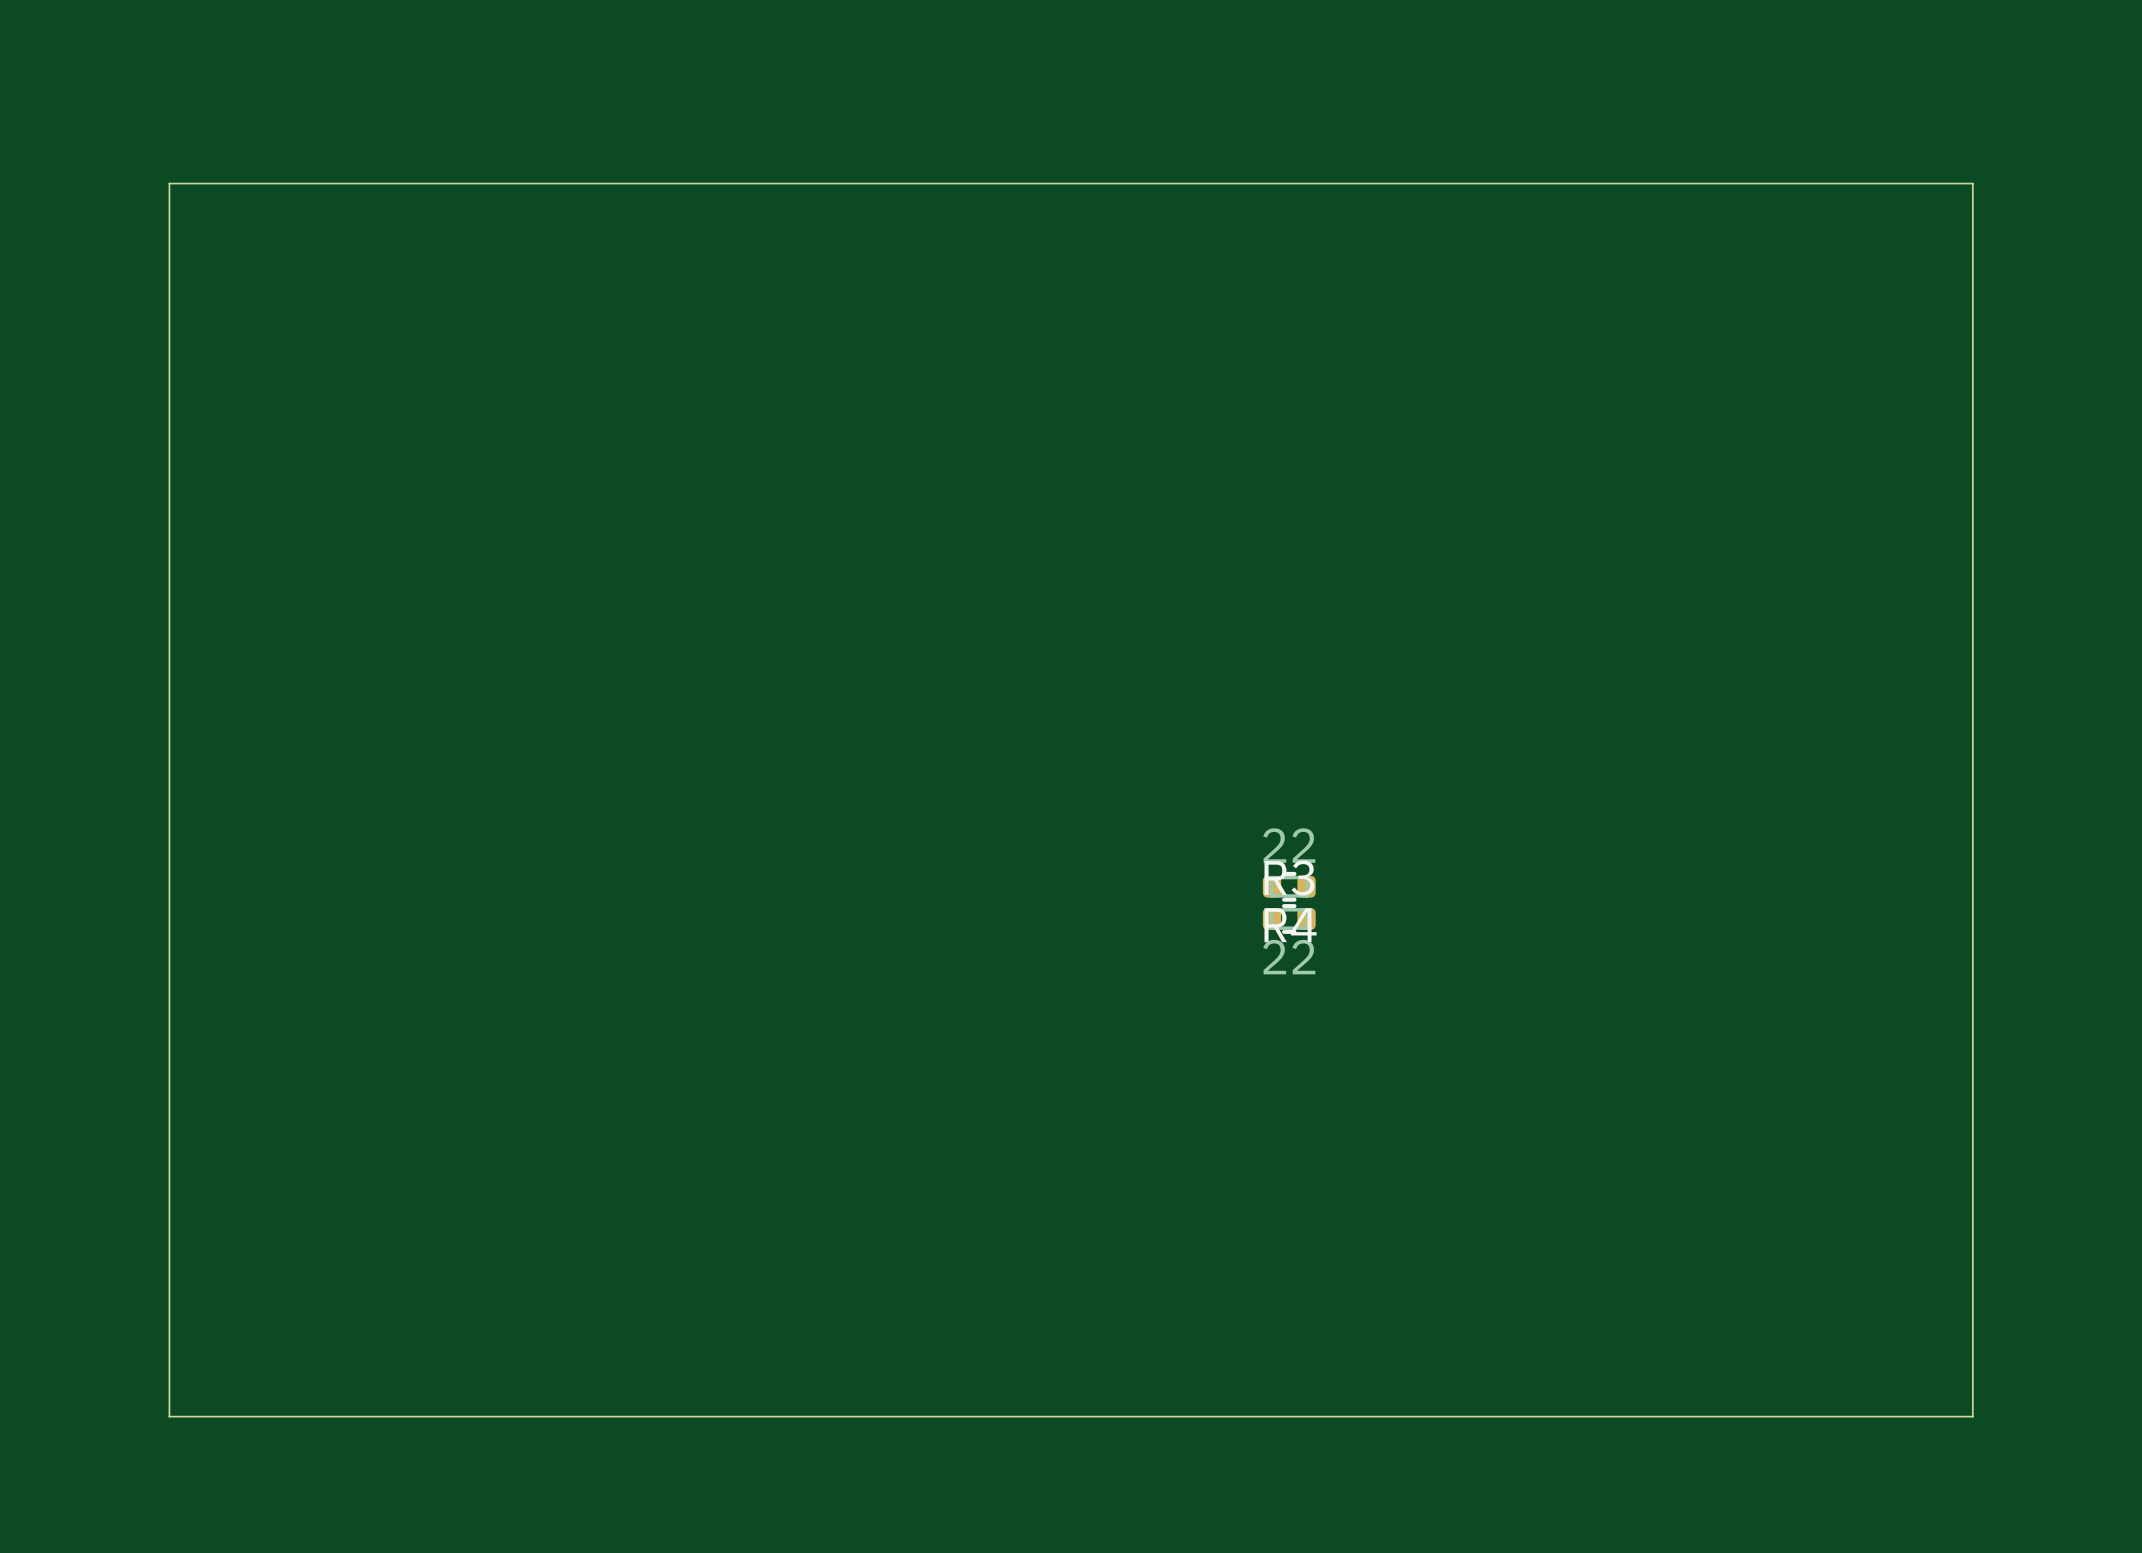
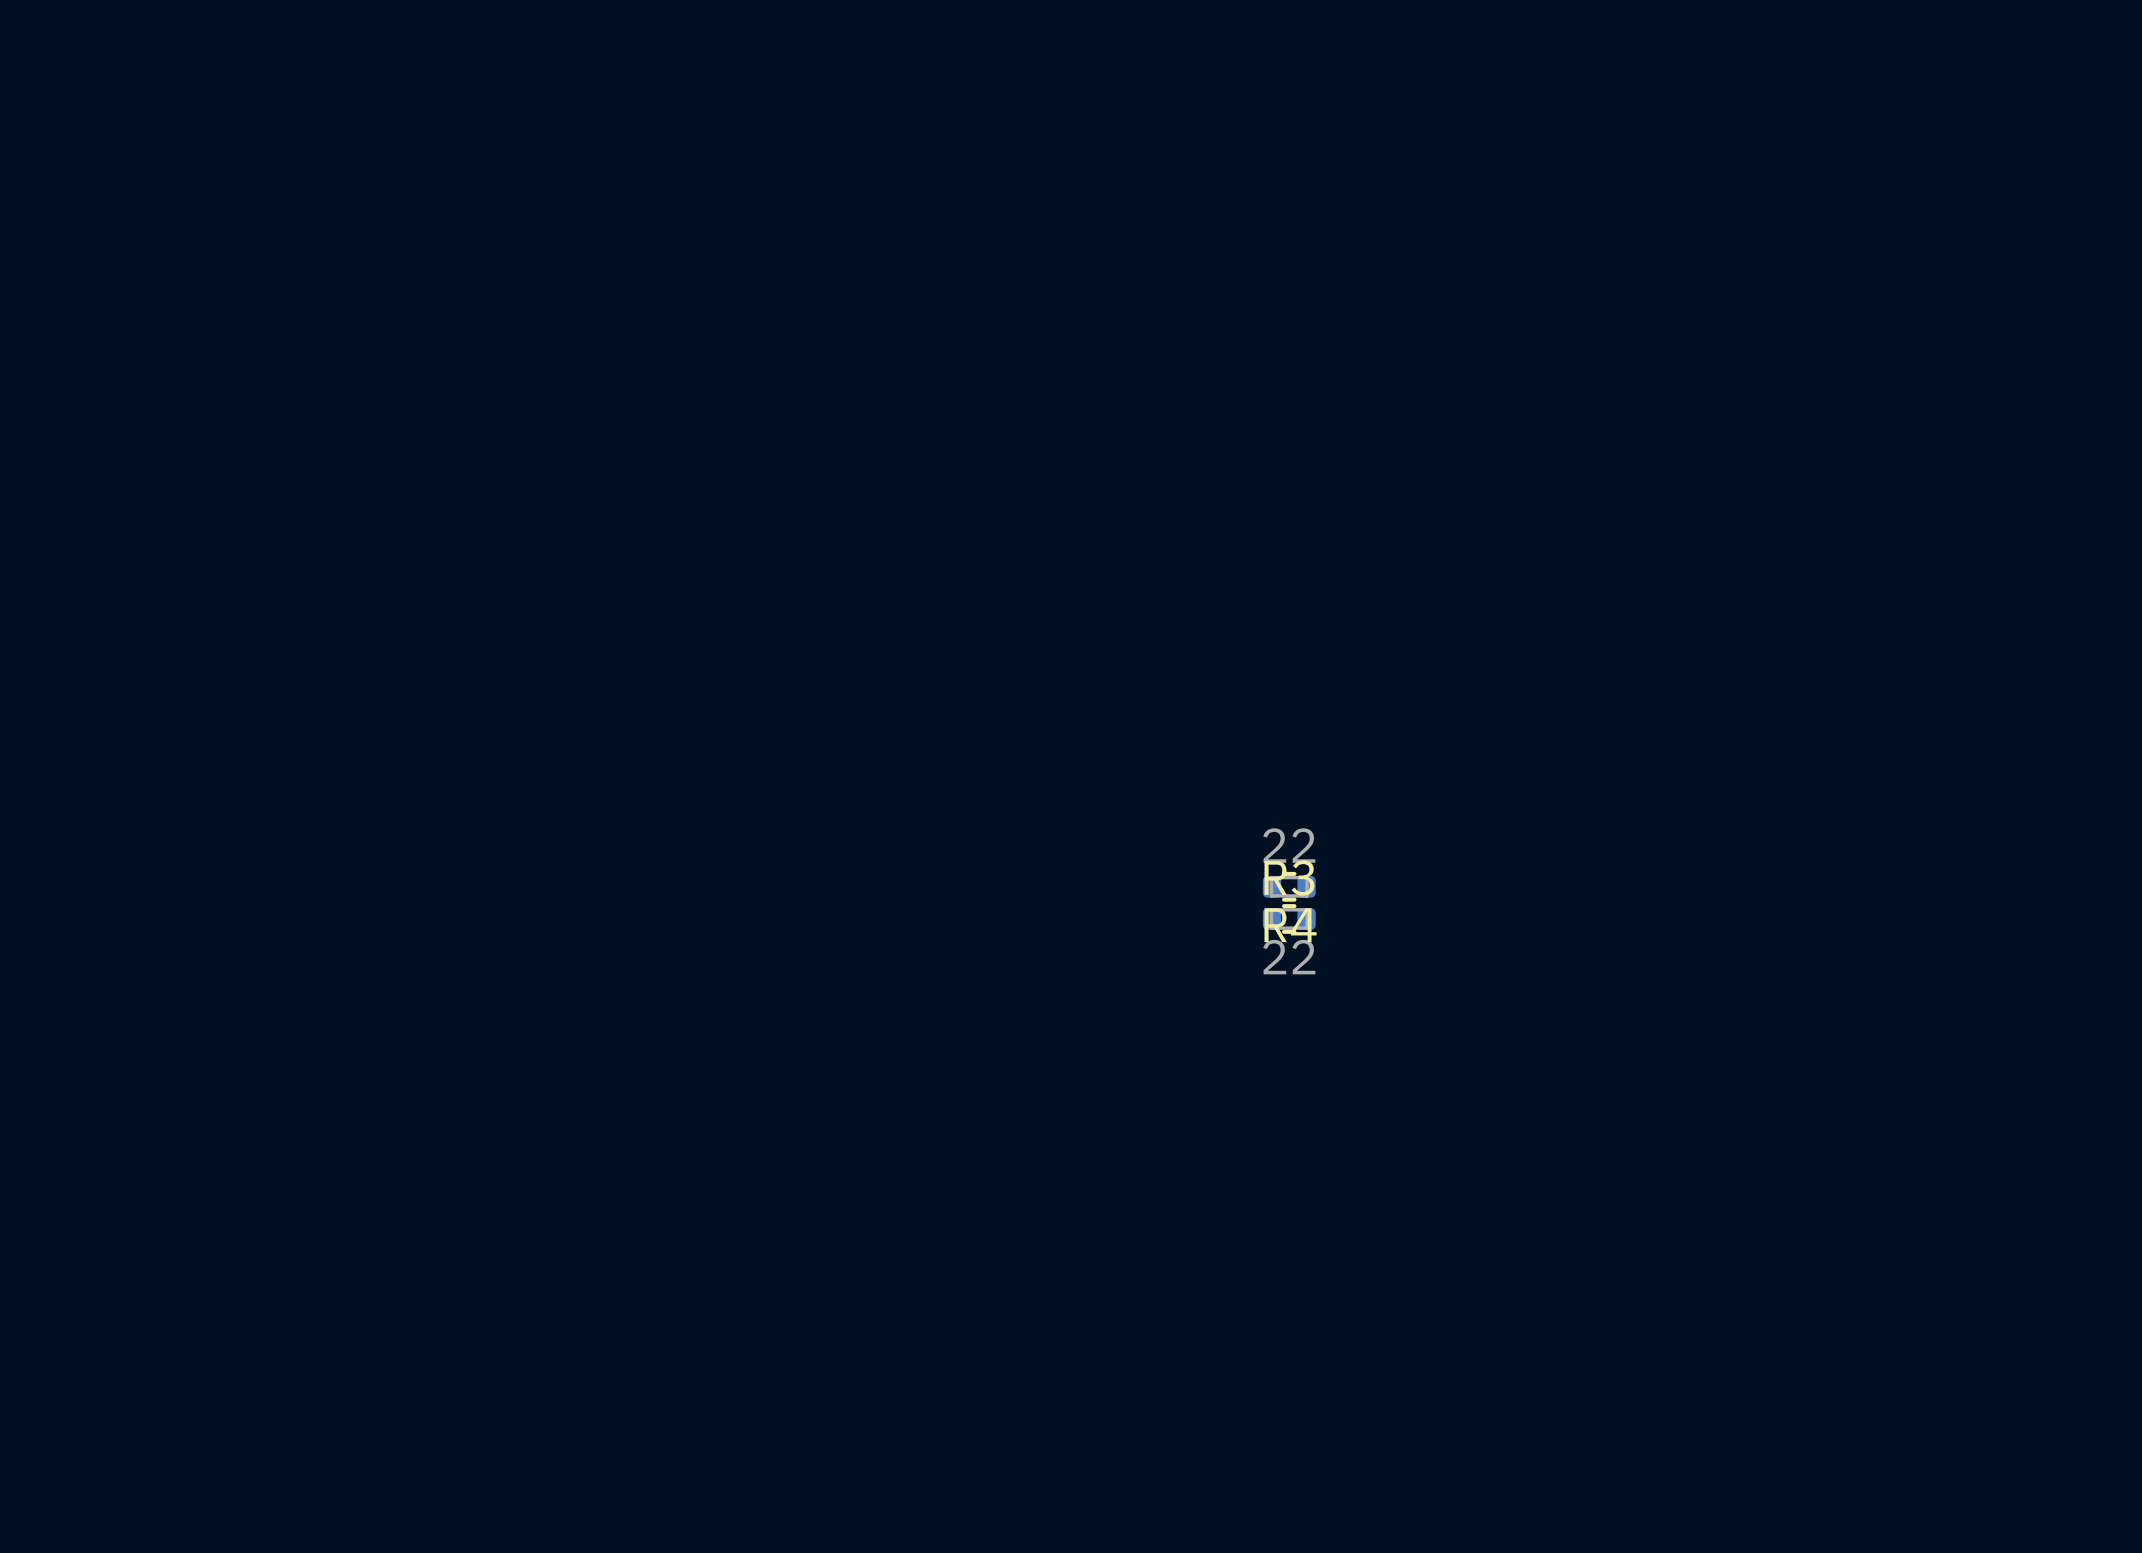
board edge: (1972, 183) (169, 183) (169, 1416) (1972, 1416) (1972, 183) -> none

